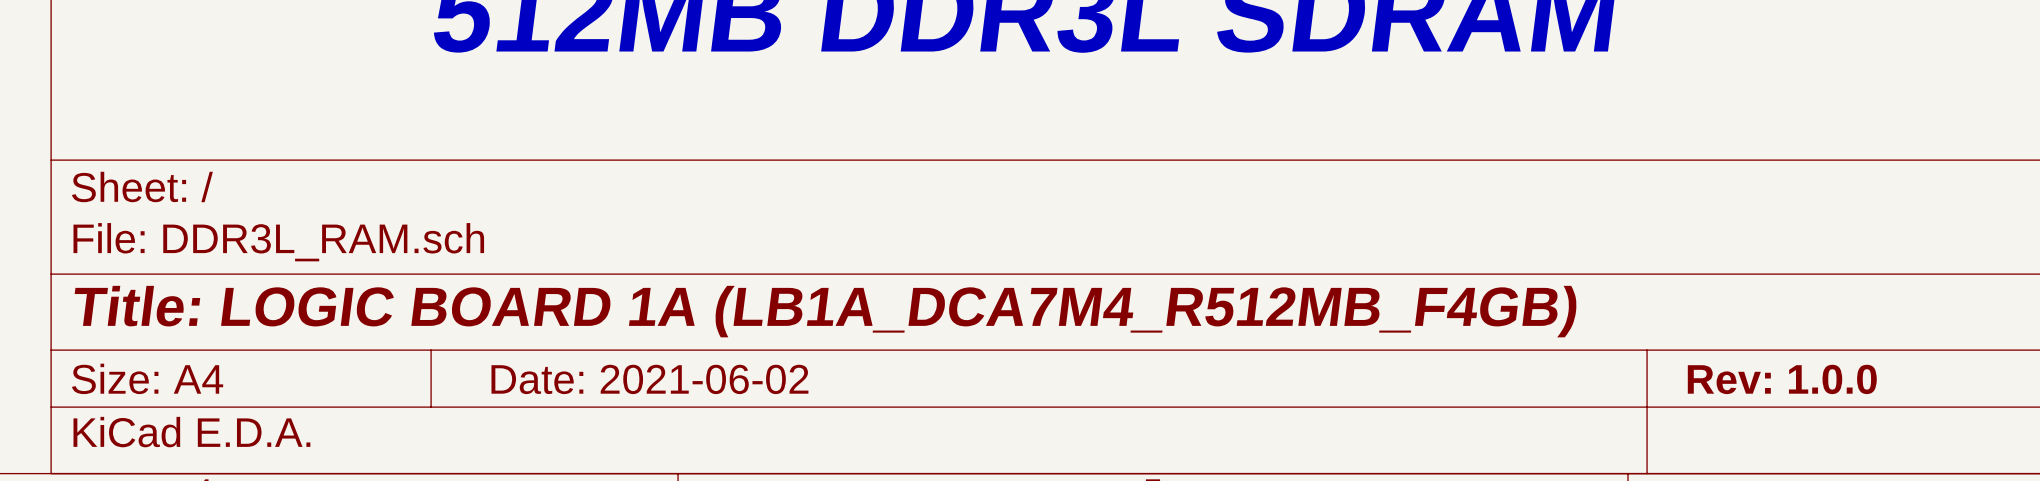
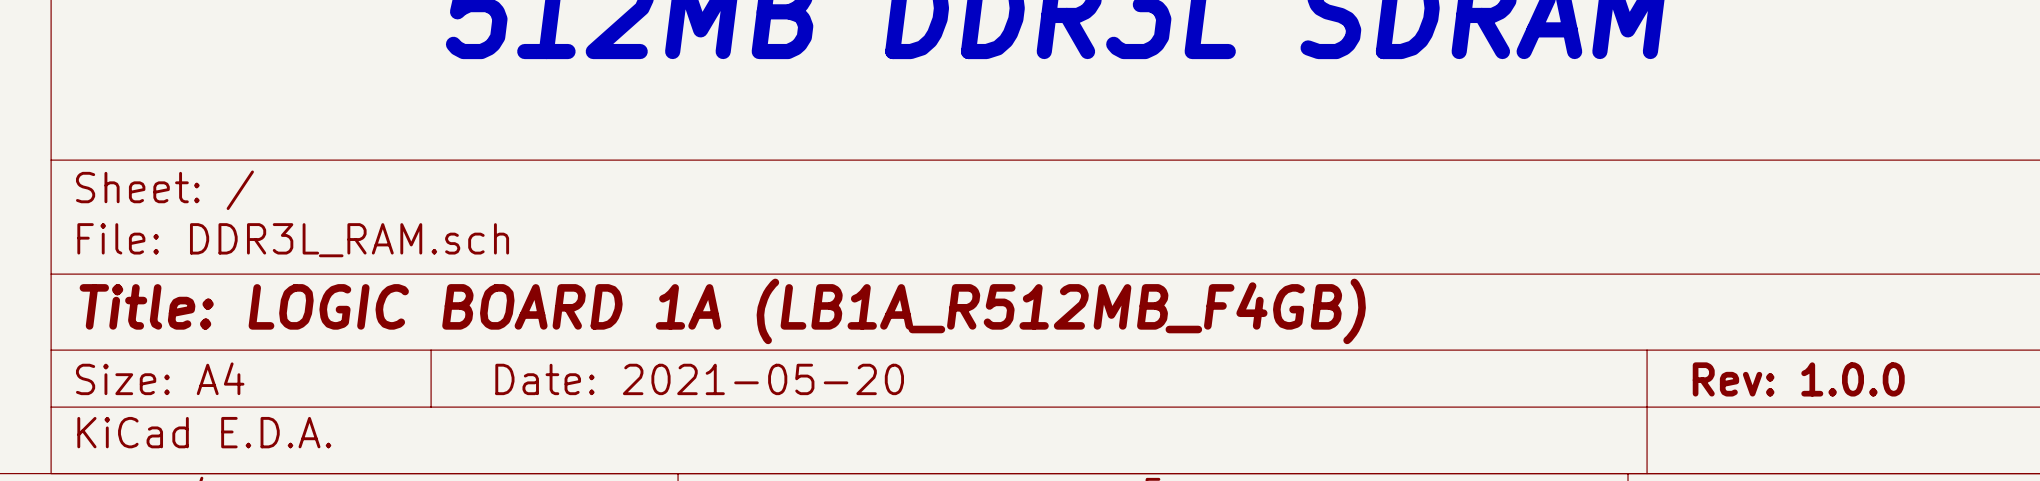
title block: Title: LOGIC BOARD 1A (LB1A_DCA7M4_R512MB_F4GB) (825, 311) -> Title: LOGIC BOARD 1A (LB1A_R512MB_F4GB) (722, 311)
title block: Date: 2021-06-02 (649, 379) -> Date: 2021-05-20 (699, 379)

